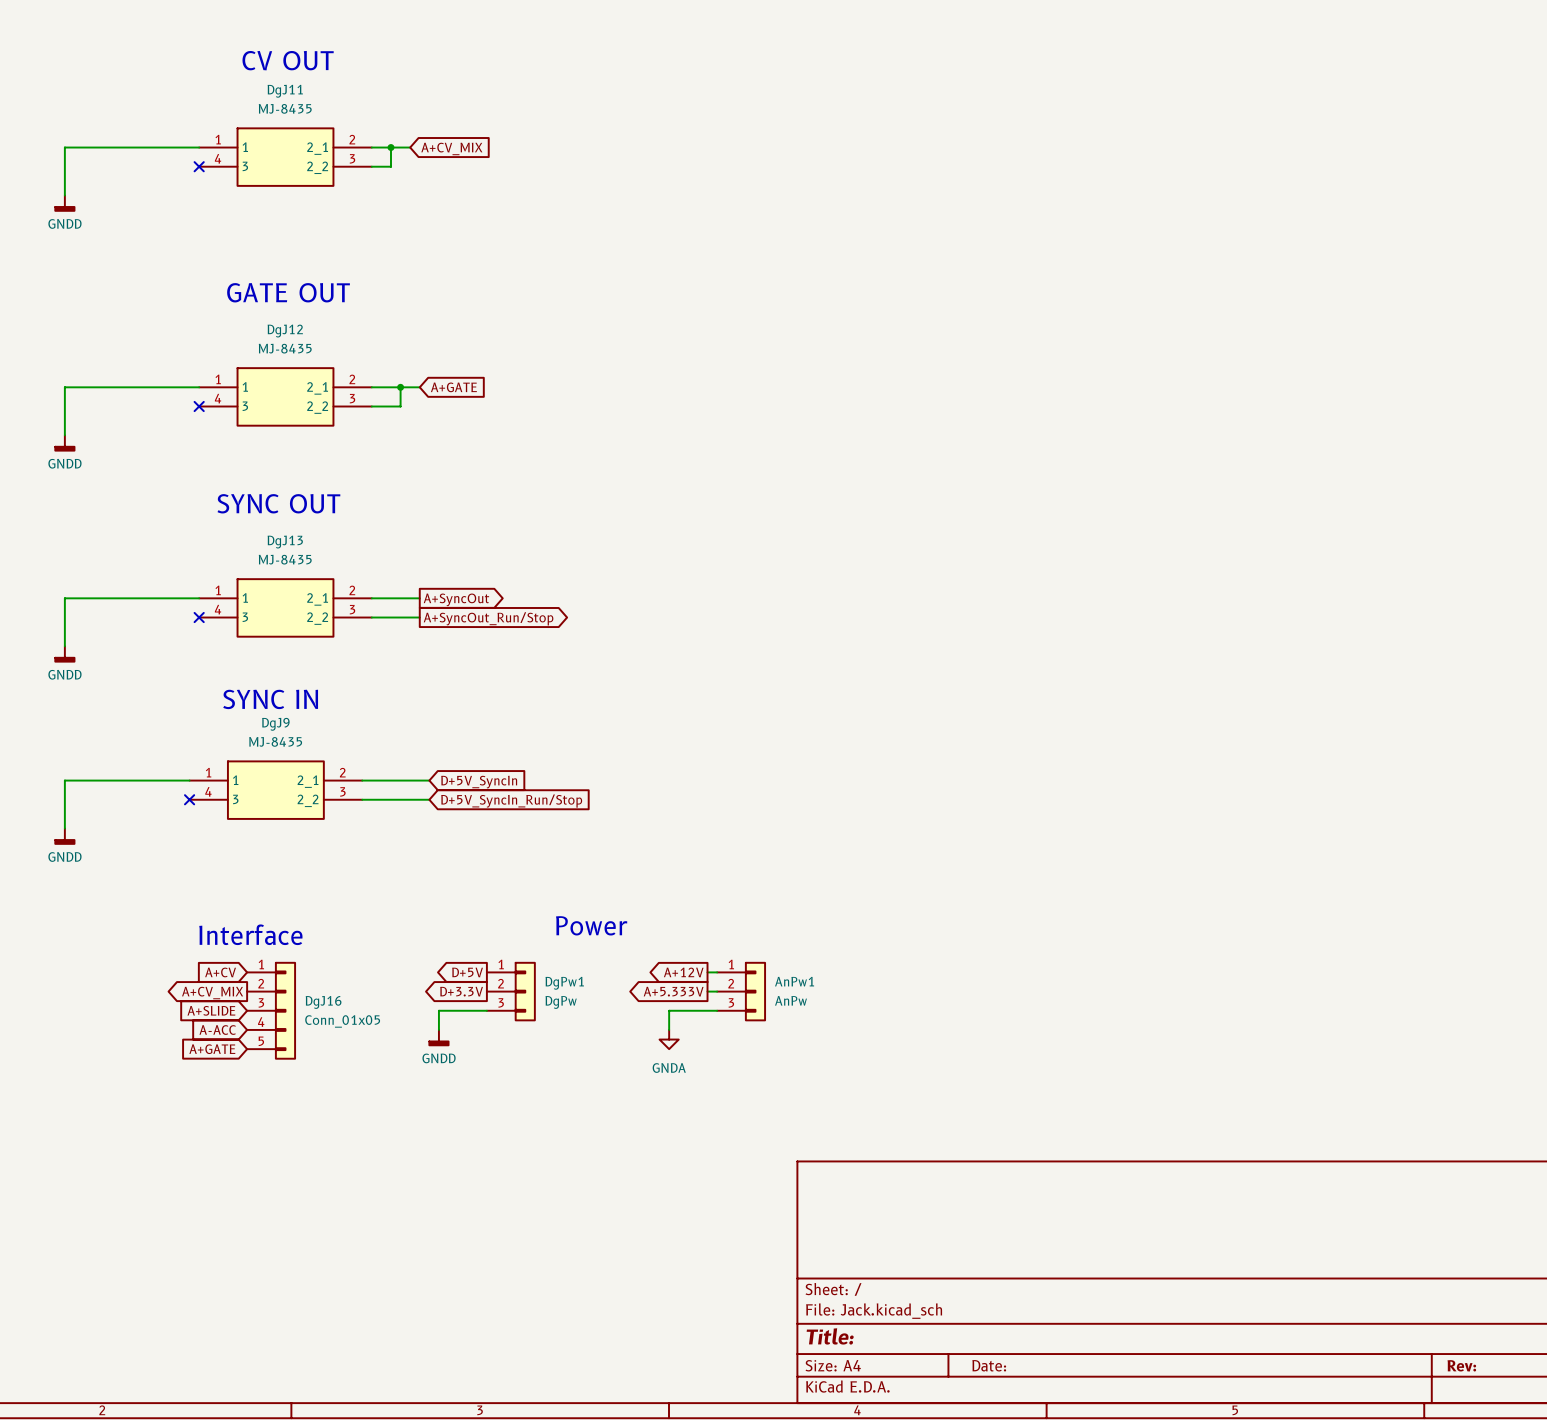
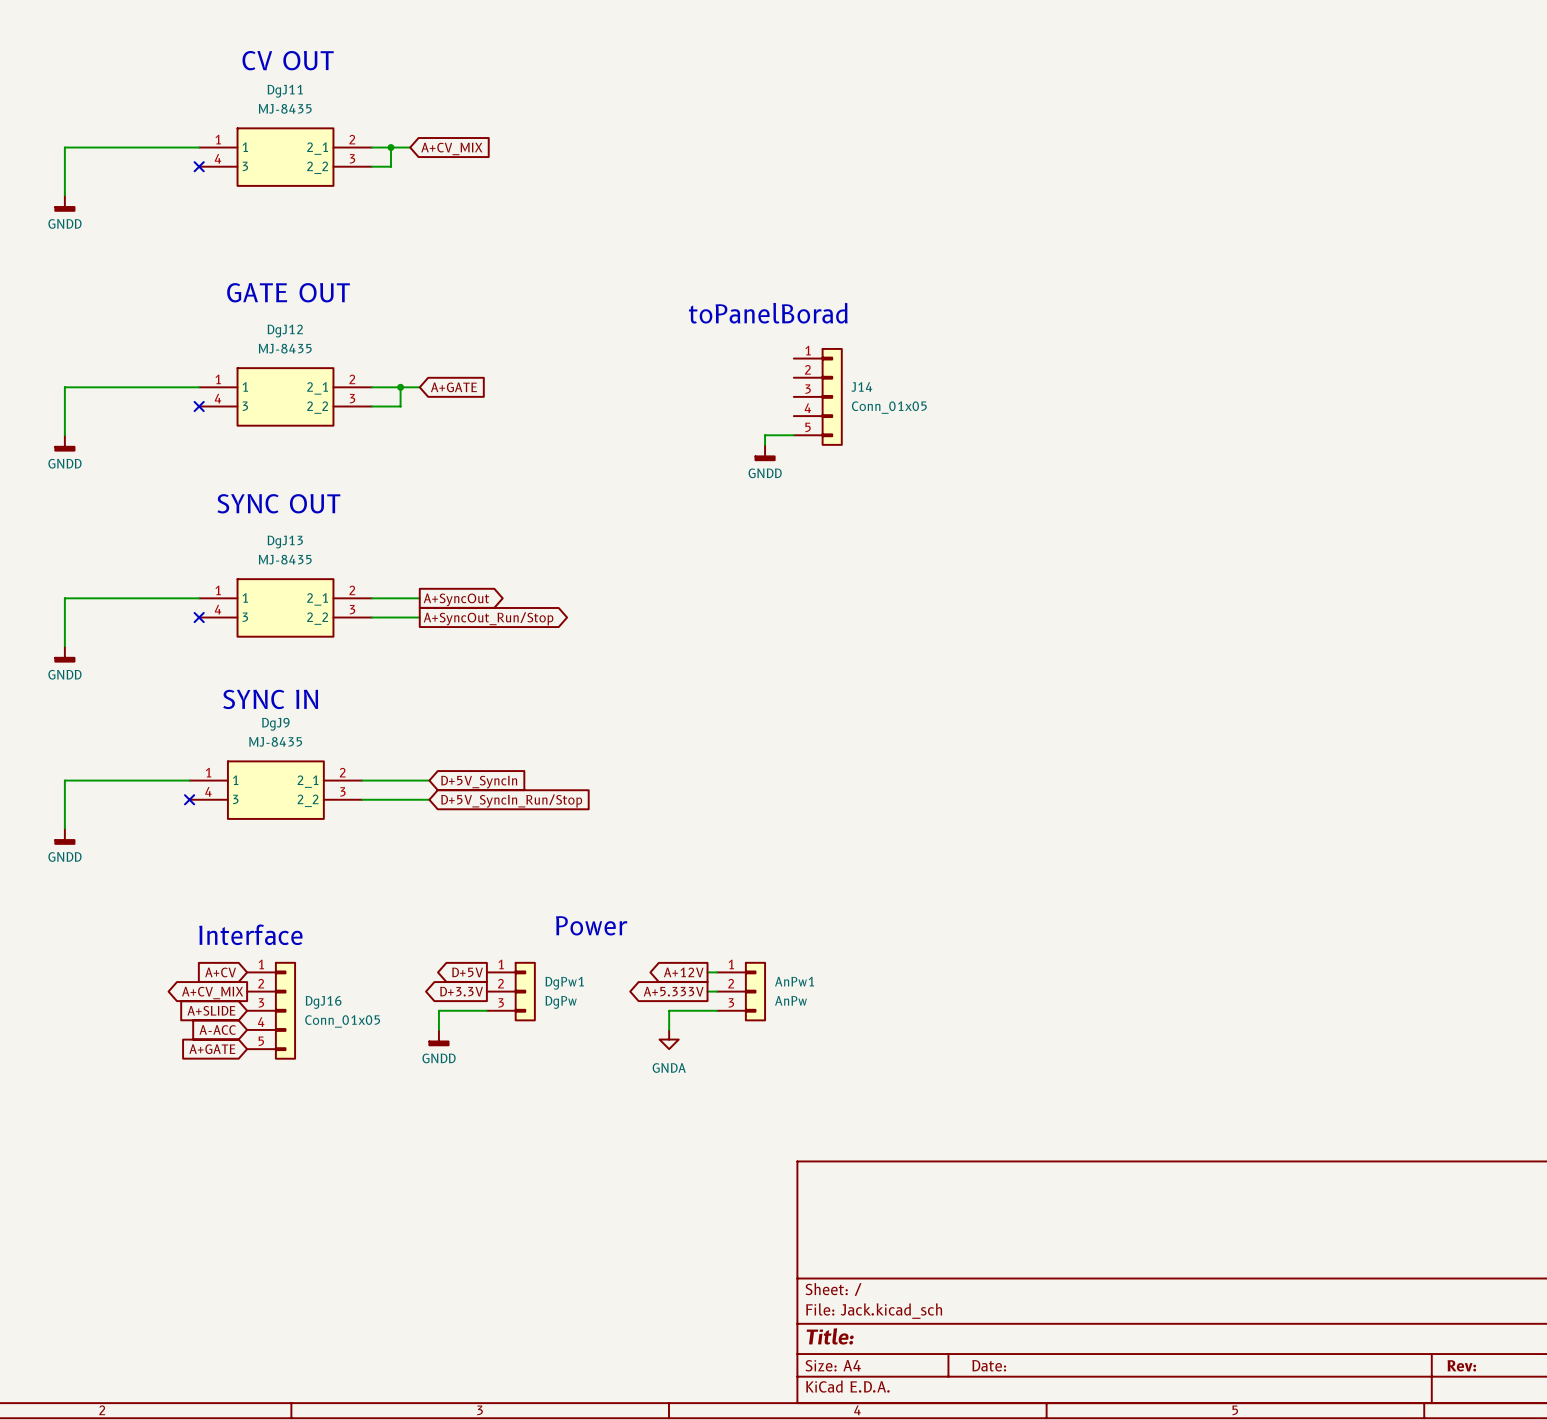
text: none -> toPanelBorad (768, 313)
J14: none -> Conn_01x05 (818, 396)
wire: none -> (793, 435) (765, 435) (765, 444)
power symbol: none -> GNDD (765, 453)

